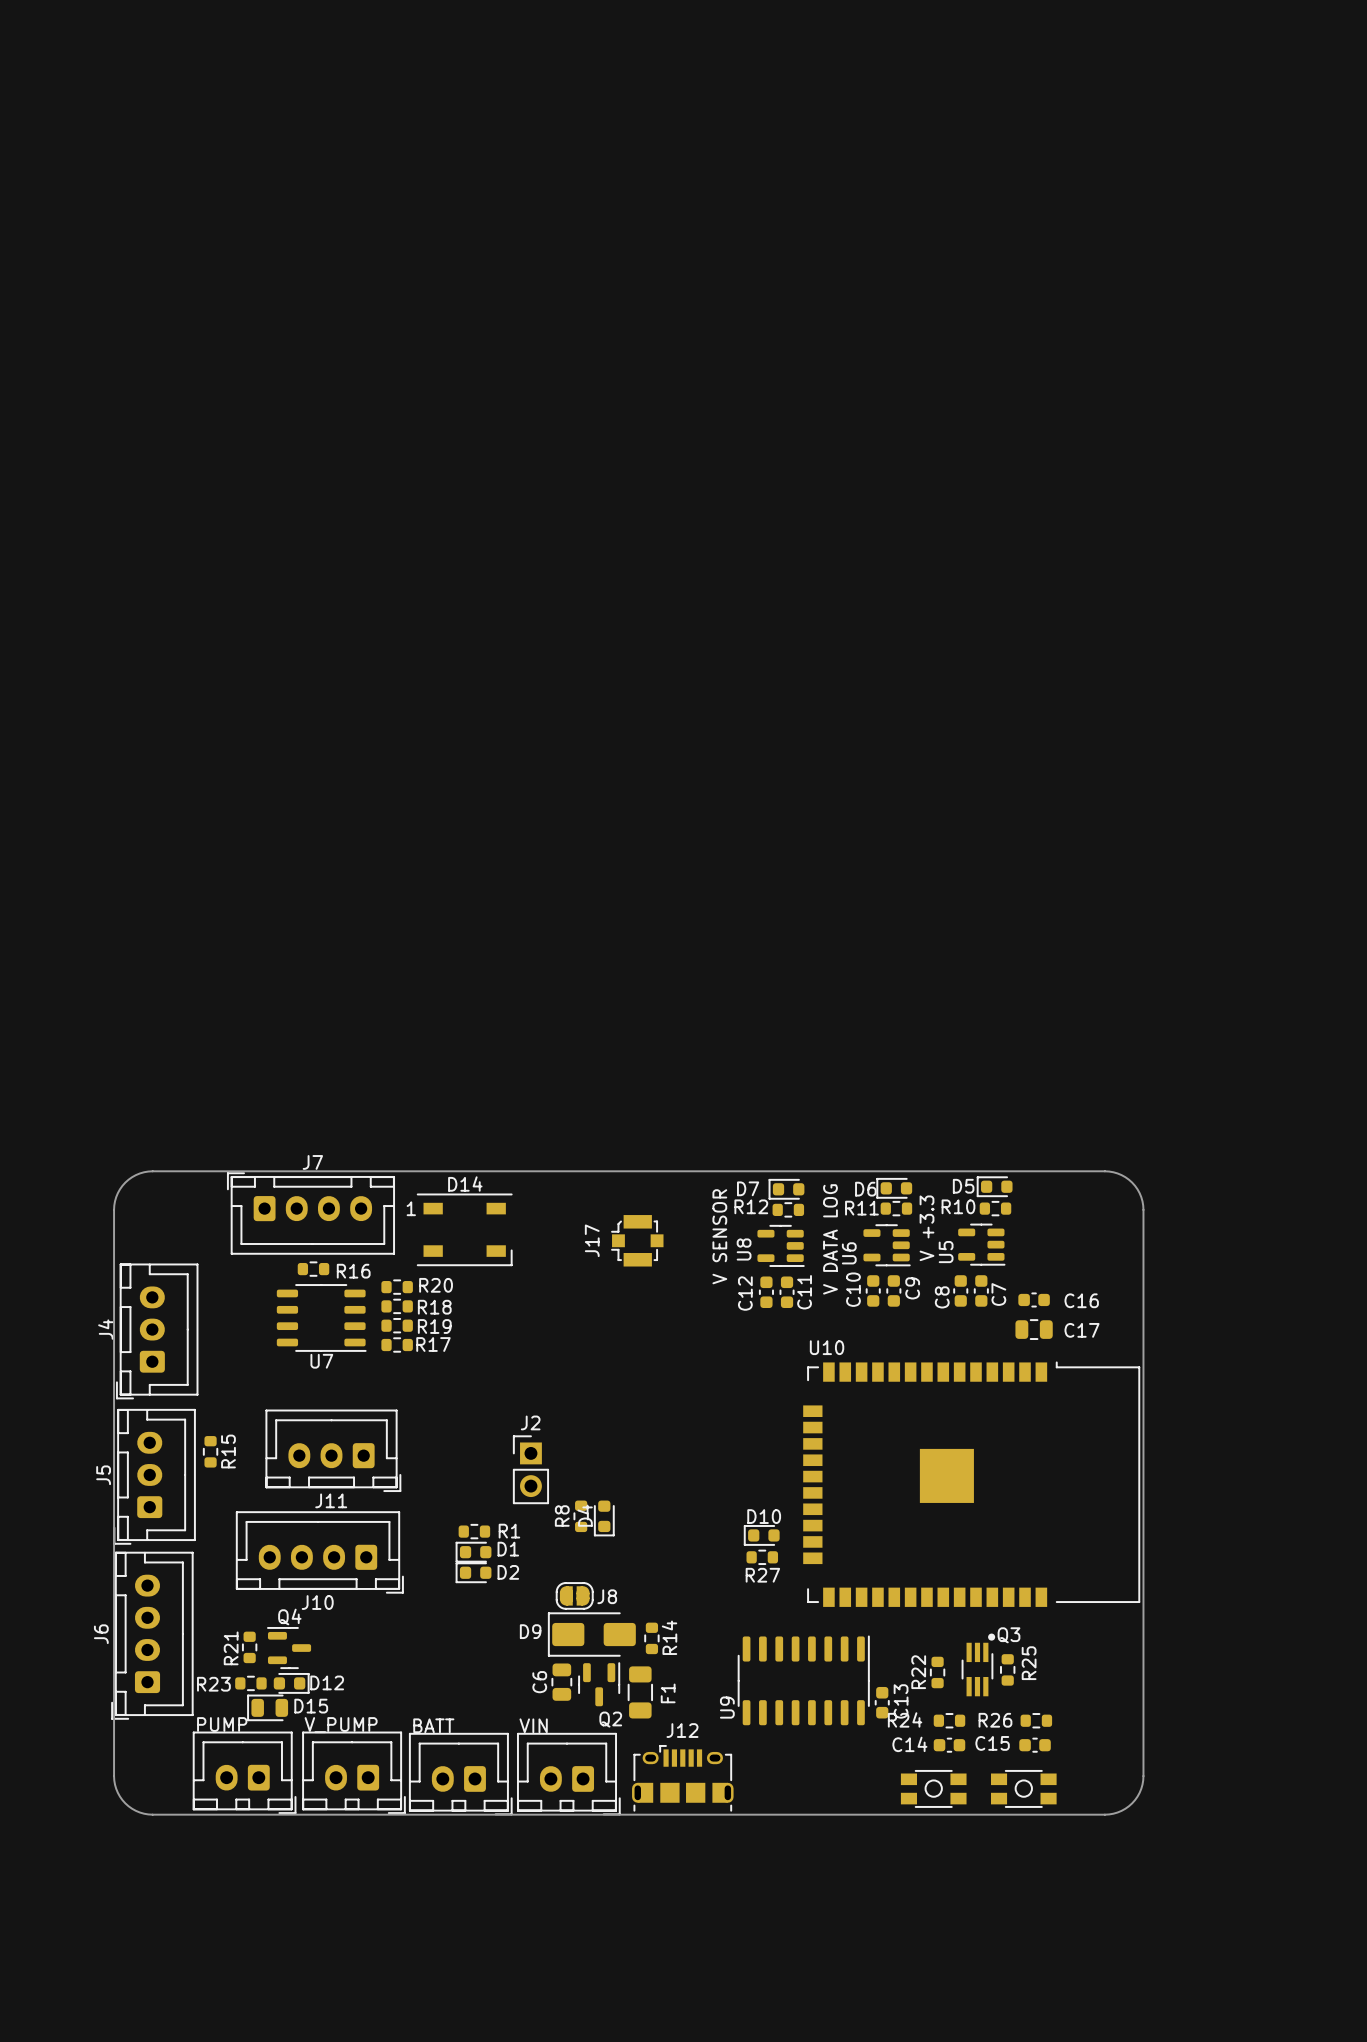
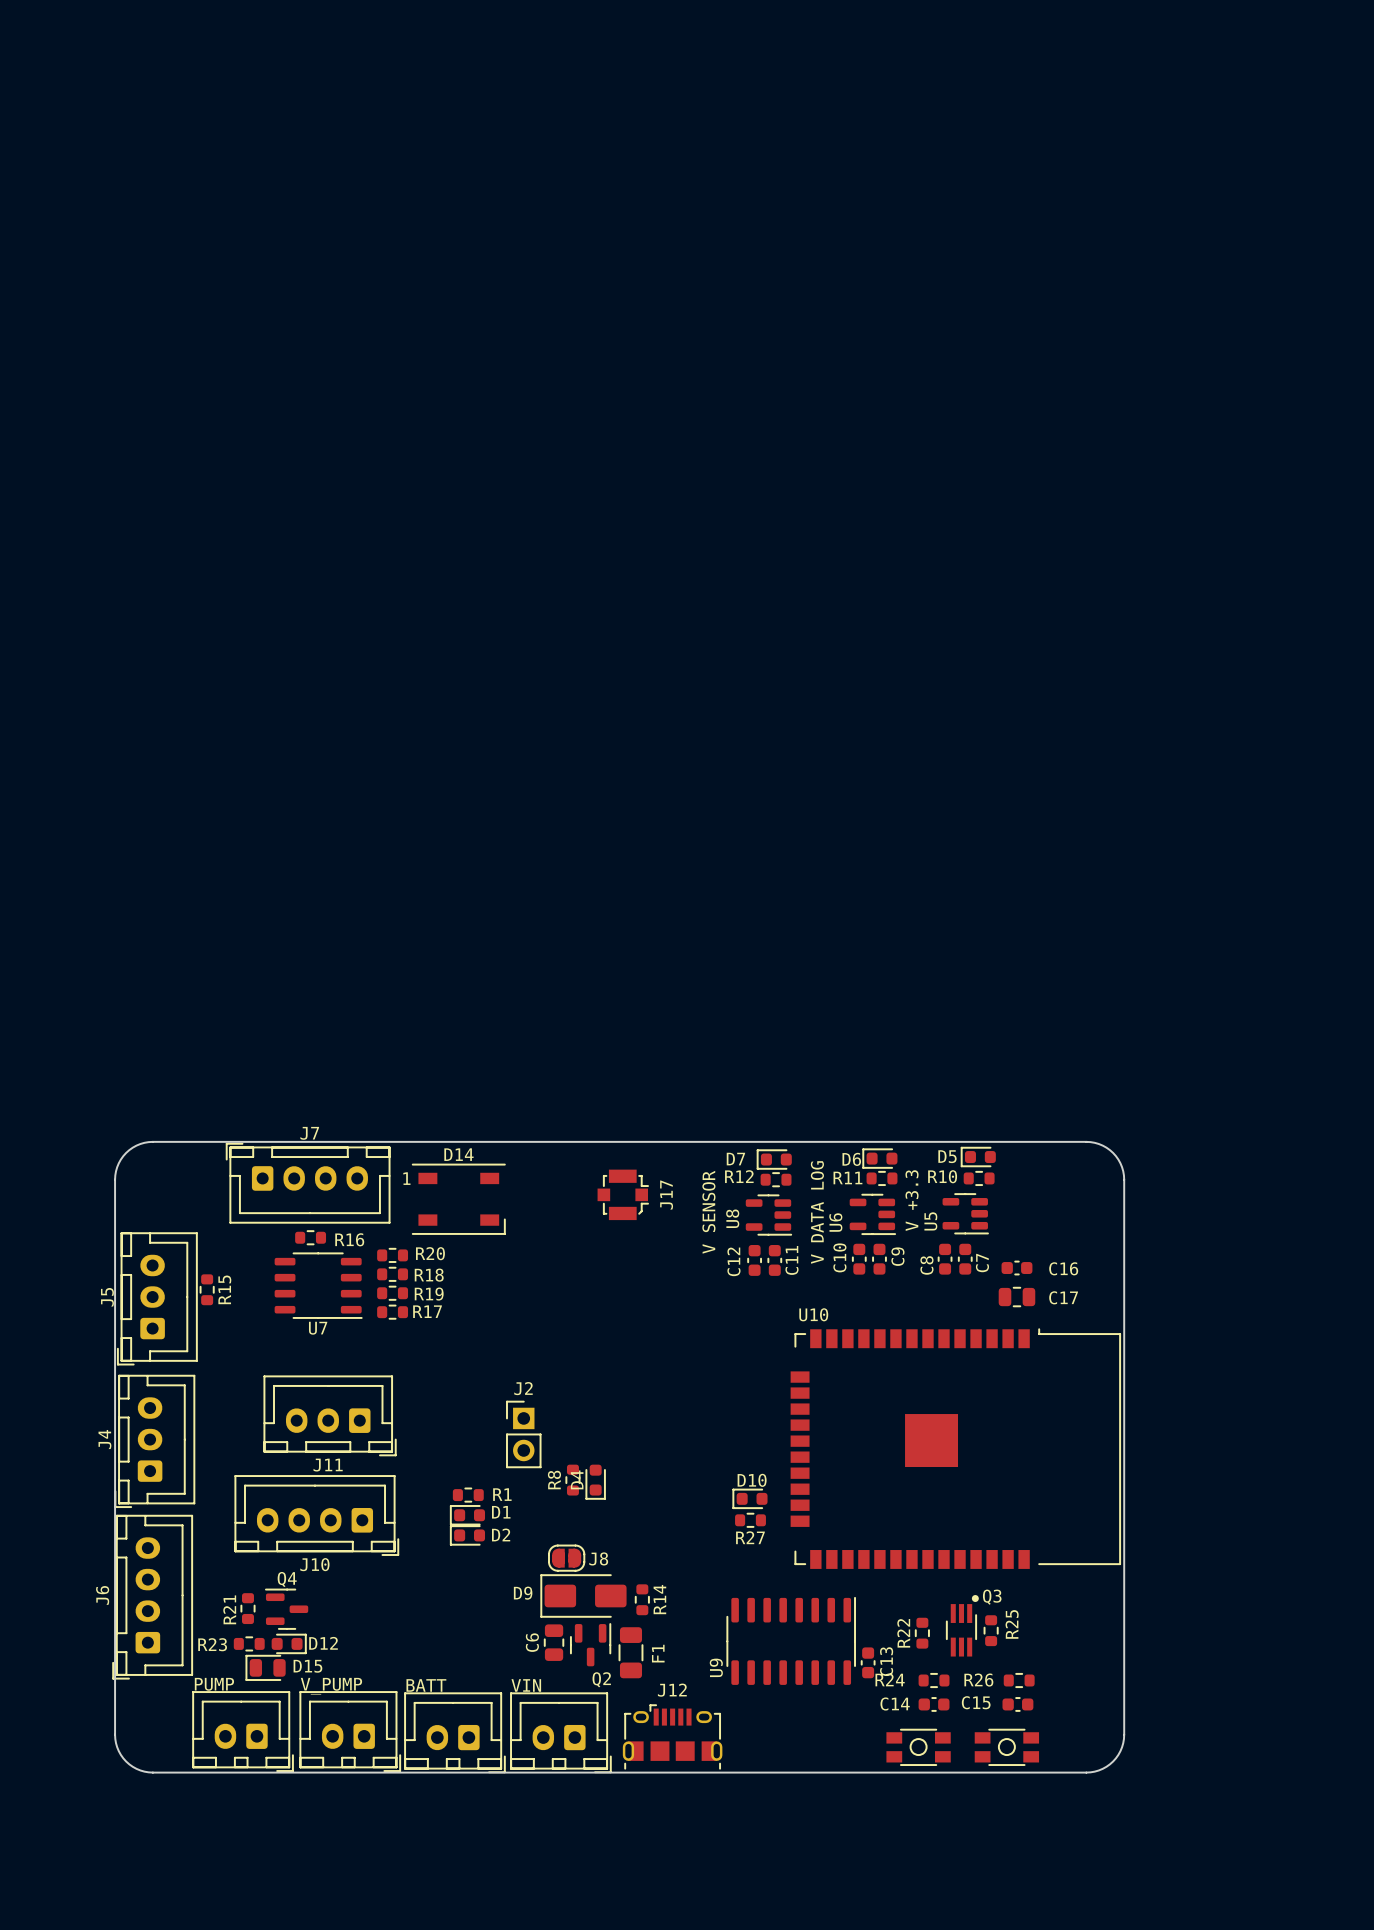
J17 rotation: 0° (637, 1240) -> 180° (623, 1194)
J4 name: J4 (105, 1329) -> J5 (107, 1297)
R15 position: (210, 1451) -> (207, 1289)
J5 name: J5 (103, 1475) -> J4 (104, 1439)

